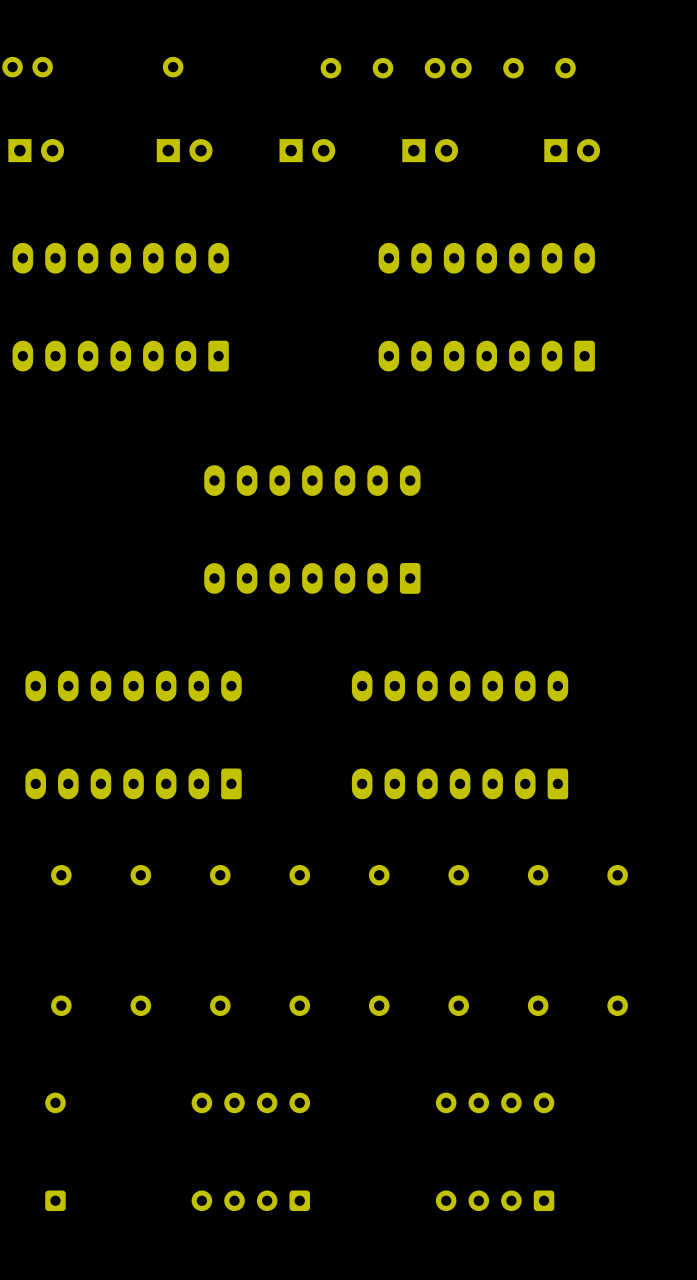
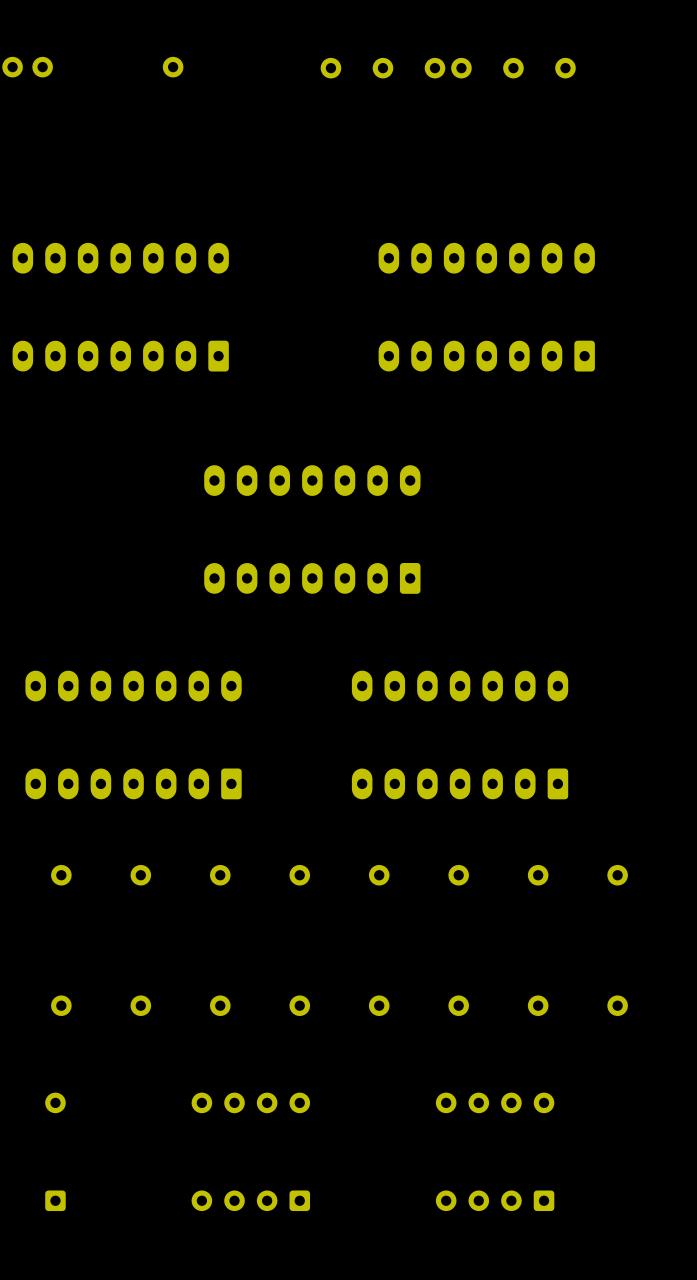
part: (36, 150) -> none
part: (184, 150) -> none
part: (307, 150) -> none
part: (430, 150) -> none
part: (572, 150) -> none

